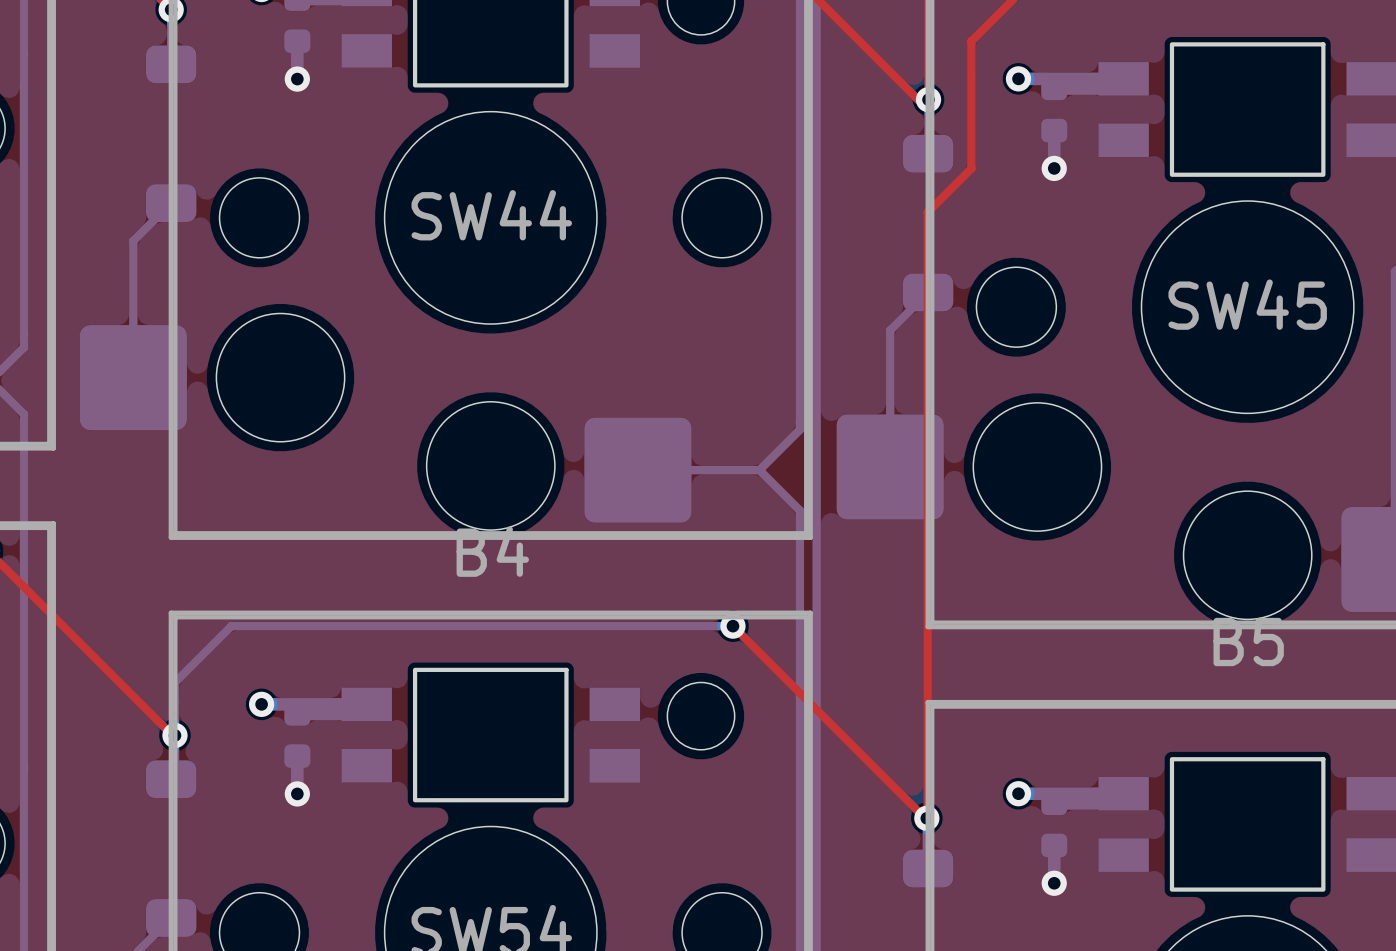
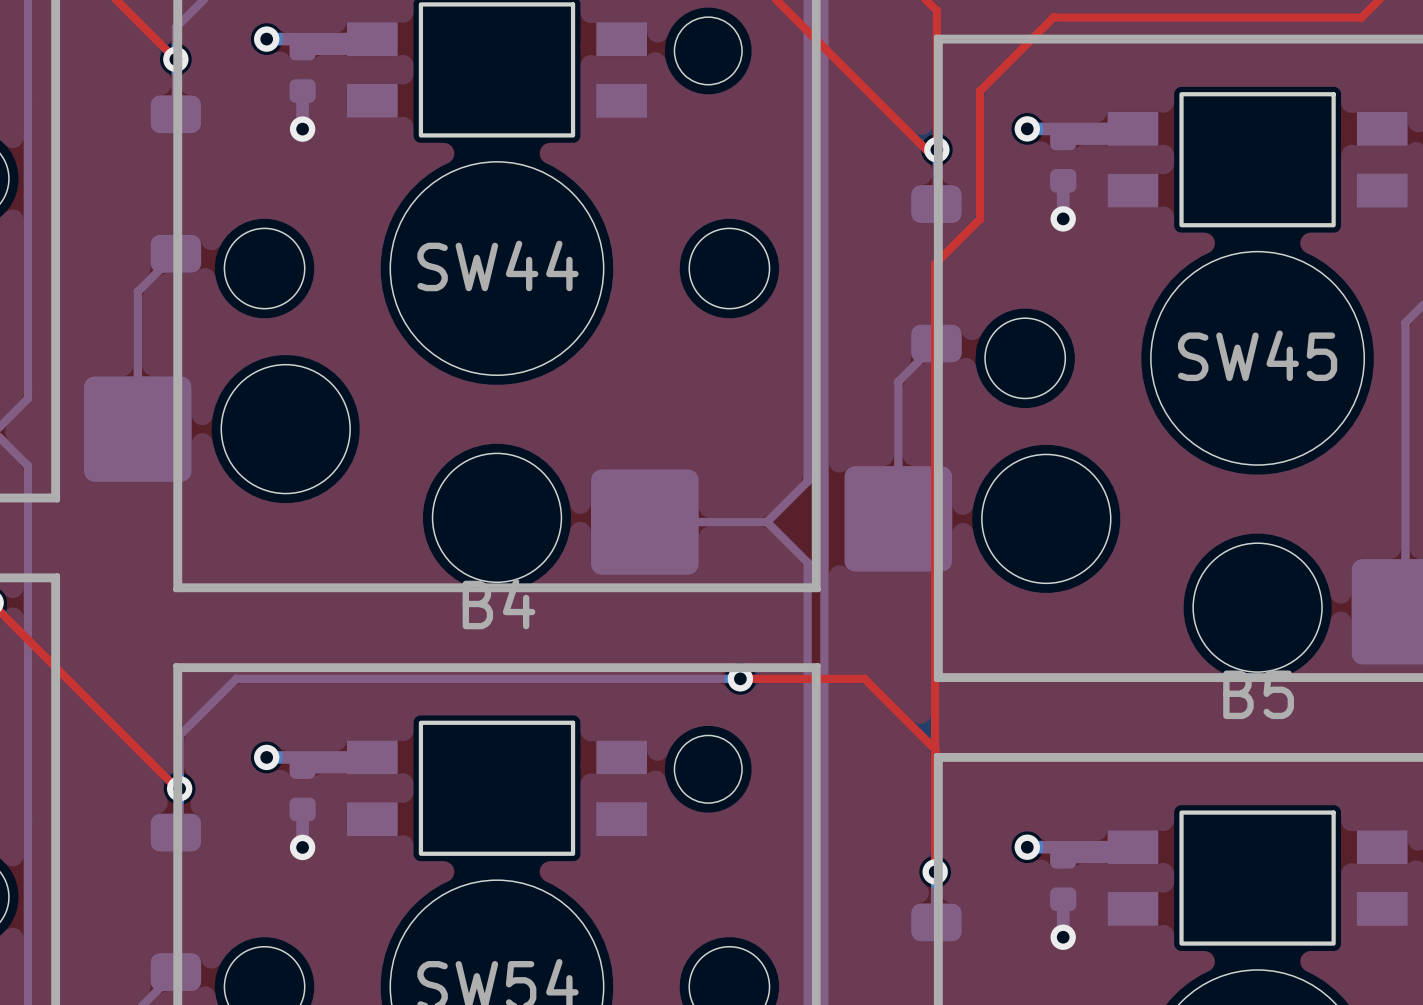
top track: (927, 212) (927, 817) (925, 818) (732, 626) -> (936, 263) (935, 871)
top track: none -> (740, 678) (864, 678) (935, 749)

